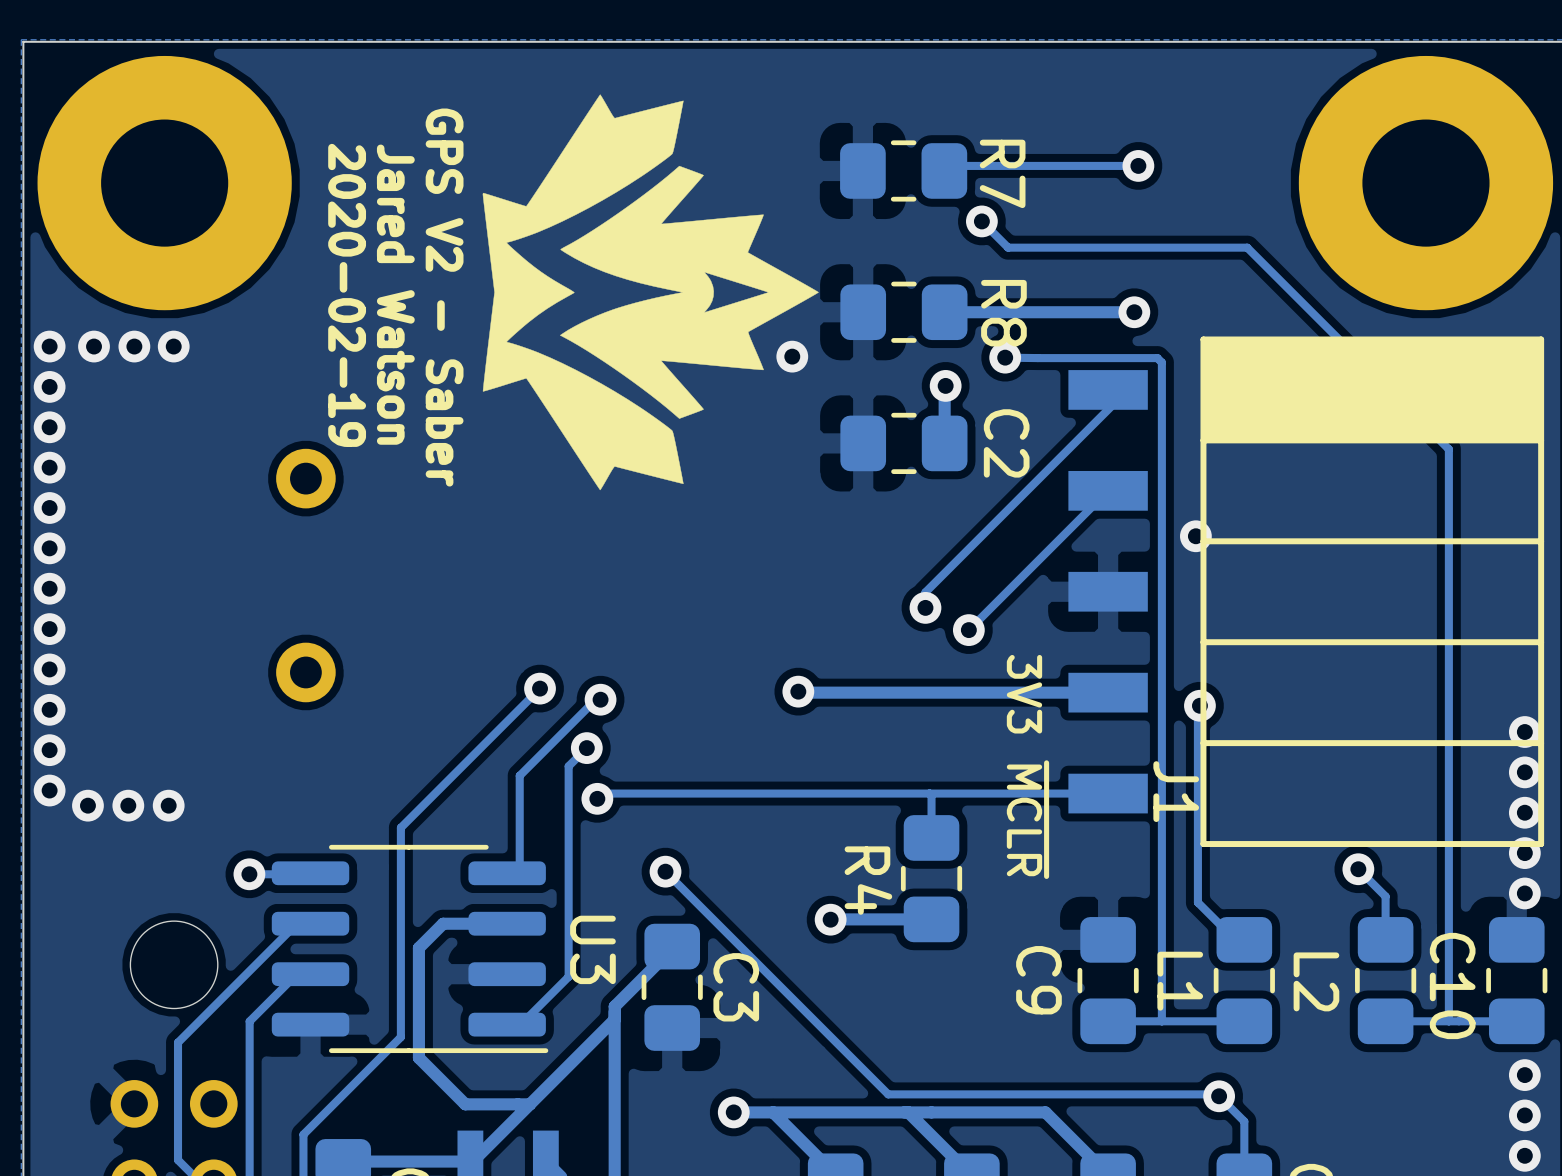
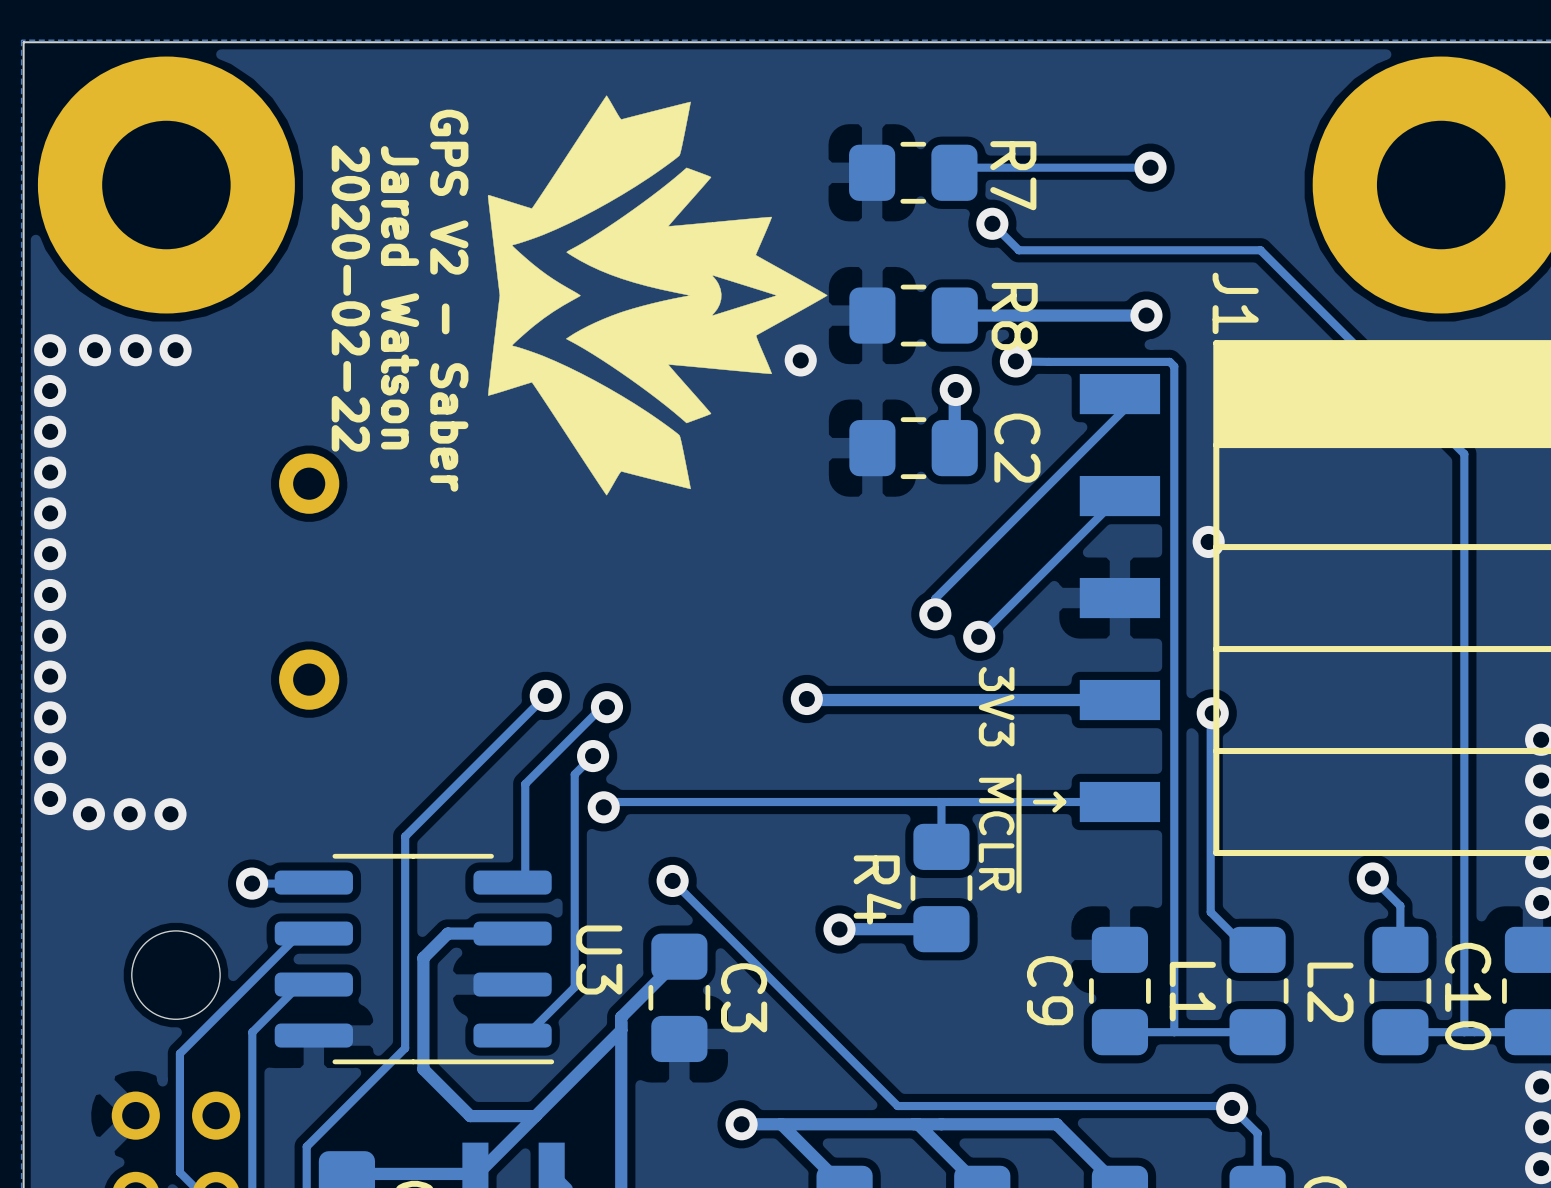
text: 2020-02-19 (347, 295) -> 2020-02-22 (350, 298)
text position: 3V3 ~{MCLR} (1027, 766) -> 3V3 ~{MCLR} (1000, 780)
line: none -> (1055, 793) (1063, 802)
J1 name position: J1 (1176, 791) -> J1 (1235, 303)
line: none -> (1063, 802) (1054, 810)
line: none -> (1063, 802) (1035, 802)

